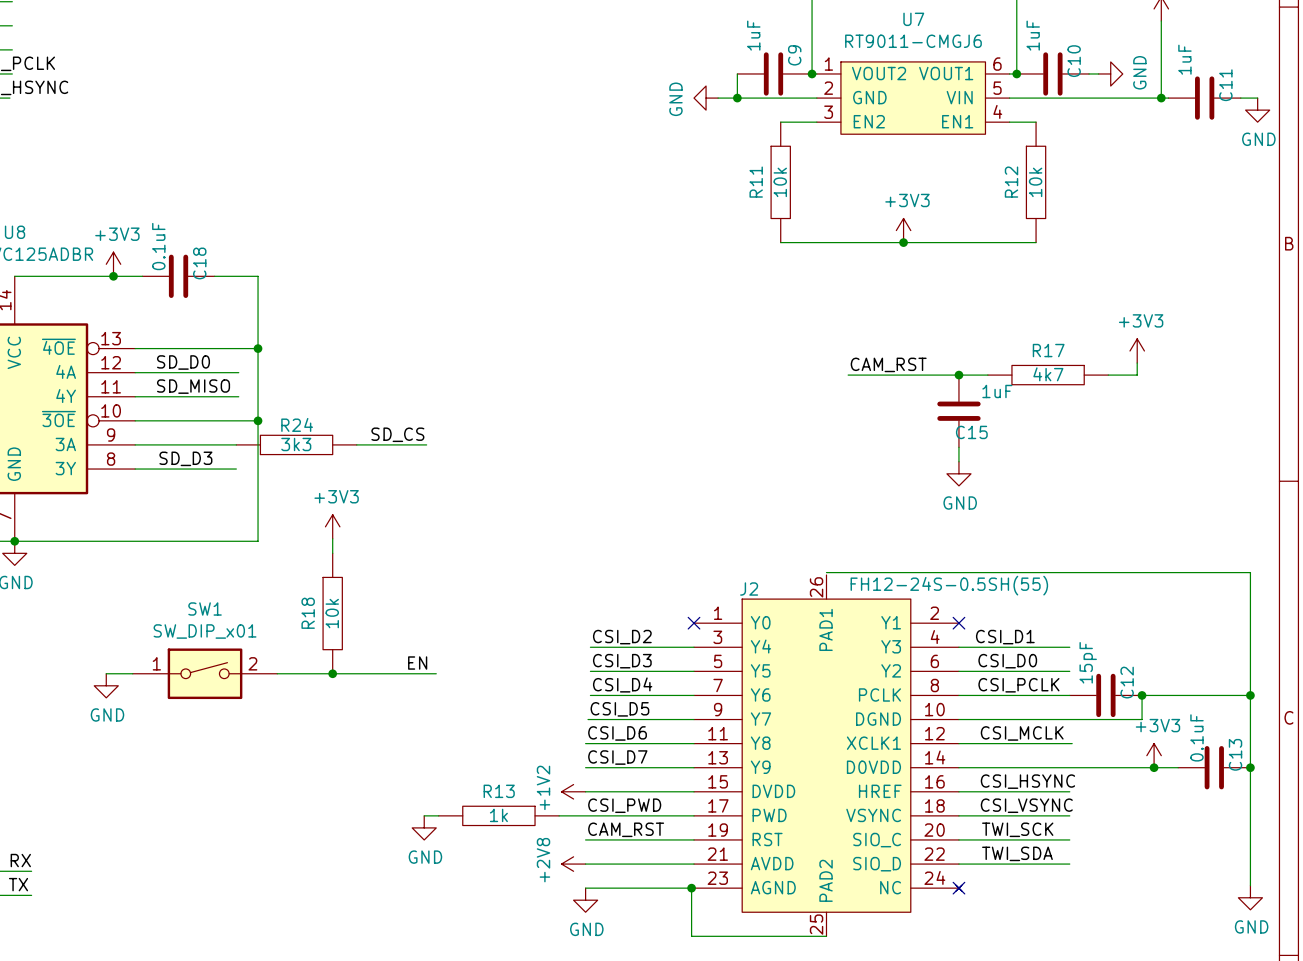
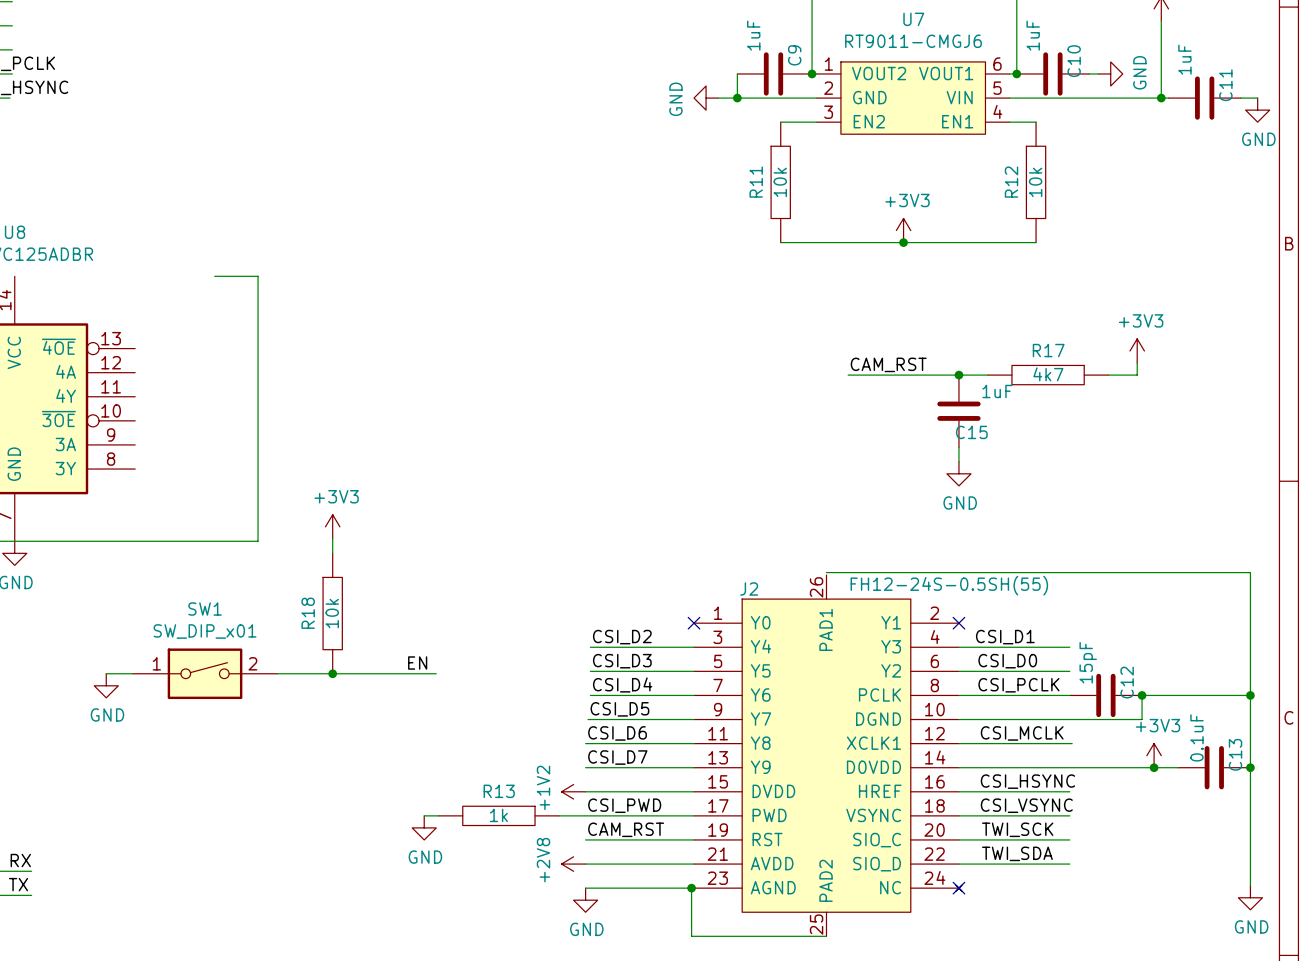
power symbol: +3V3 (113, 264) -> none
wire: (14, 276) (142, 276) -> none
junction: (113, 276) -> none
C18: 0.1uF (178, 276) -> none
wire: (135, 348) (258, 348) -> none
junction: (258, 348) -> none
label: SD_D0 (183, 362) -> none
wire: (135, 372) (238, 372) -> none
label: SD_MISO (193, 386) -> none
wire: (135, 396) (238, 396) -> none
wire: (135, 420) (258, 420) -> none
junction: (258, 420) -> none
label: SD_CS (397, 434) -> none
wire: (135, 444) (236, 444) -> none
R24: 3k3 (296, 444) -> none
wire: (356, 444) (426, 444) -> none
label: SD_D3 (185, 458) -> none
wire: (135, 469) (236, 469) -> none
junction: (14, 541) -> none

